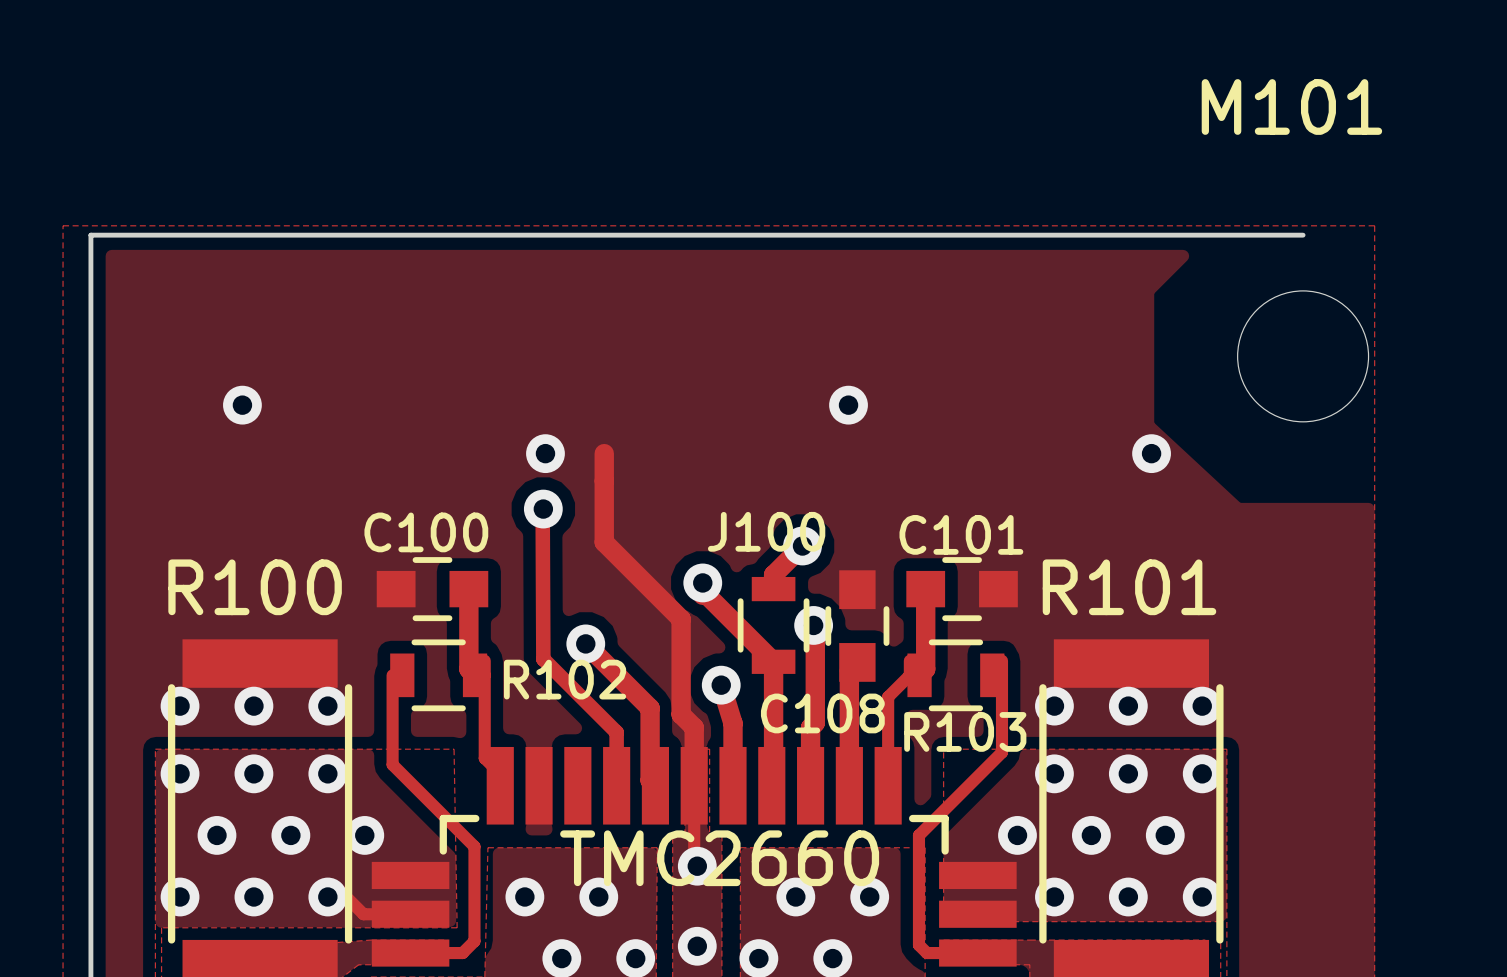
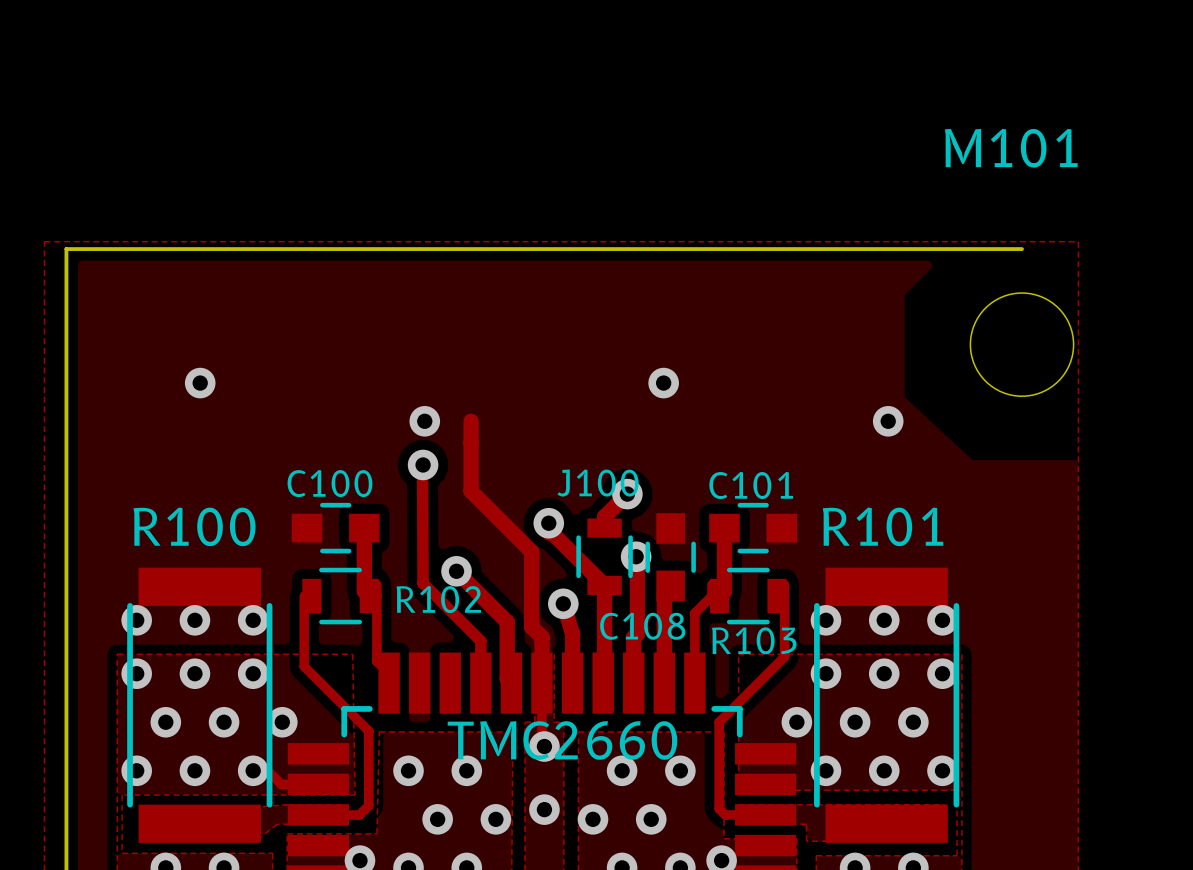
via position: (242, 405) -> (200, 383)
via position: (1151, 453) -> (888, 421)

